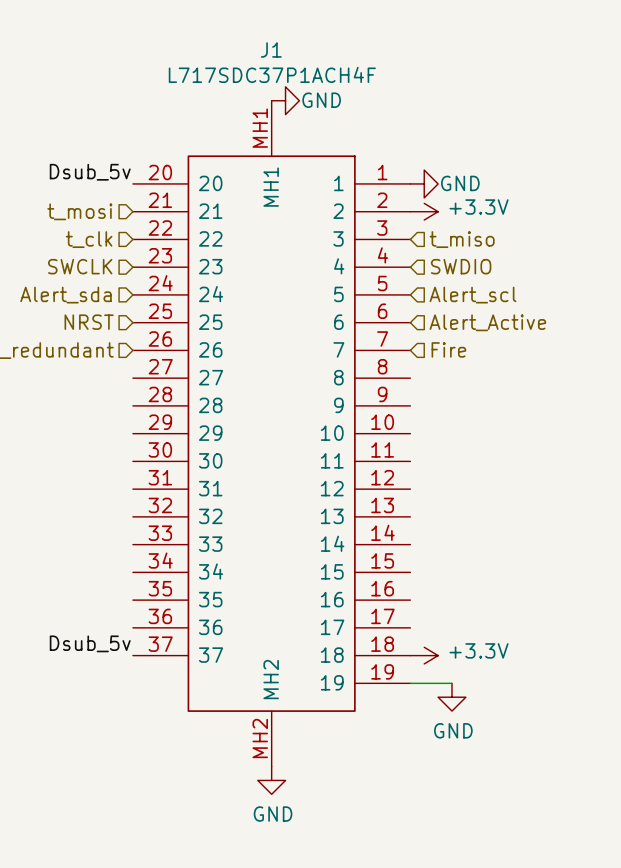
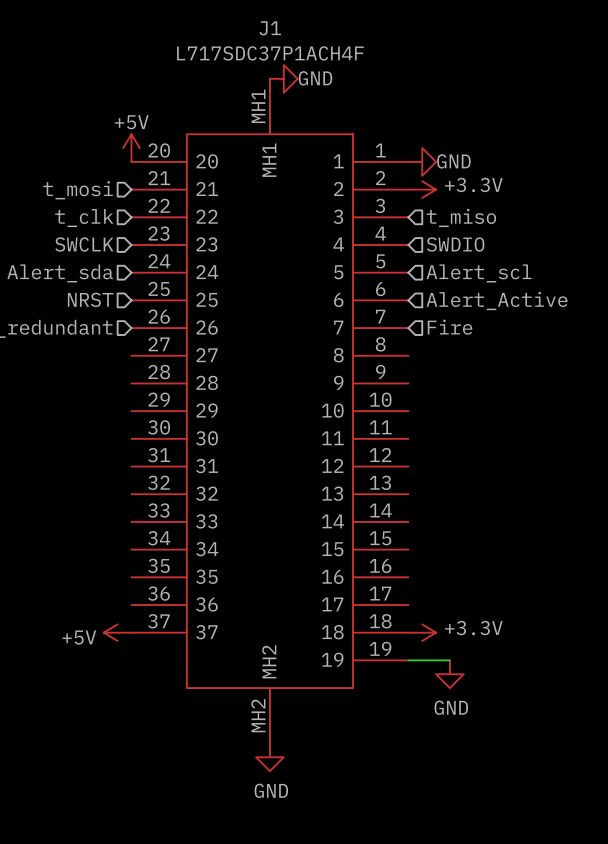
power symbol: none -> +5V (131, 148)
label: Dsub_5v (90, 172) -> none
label: Dsub_5v (90, 643) -> none
power symbol: none -> +5V (117, 632)

